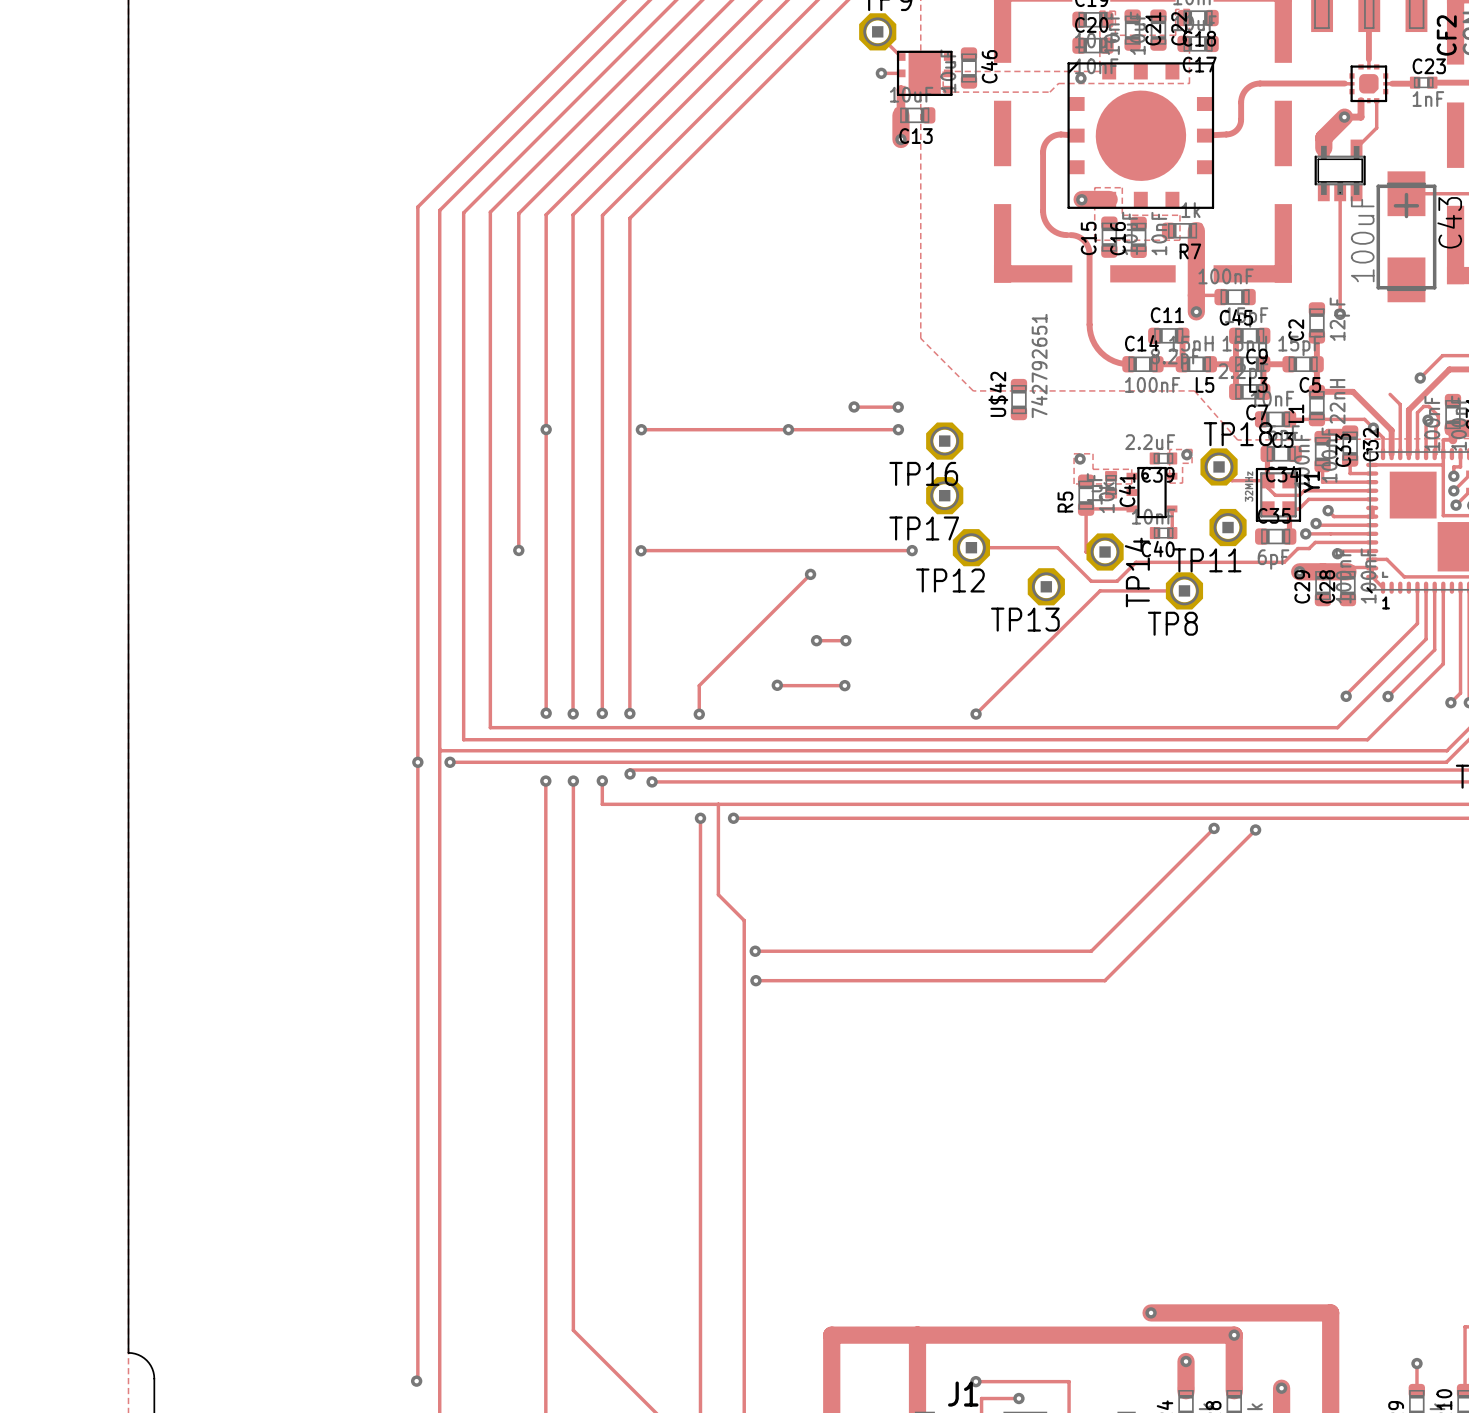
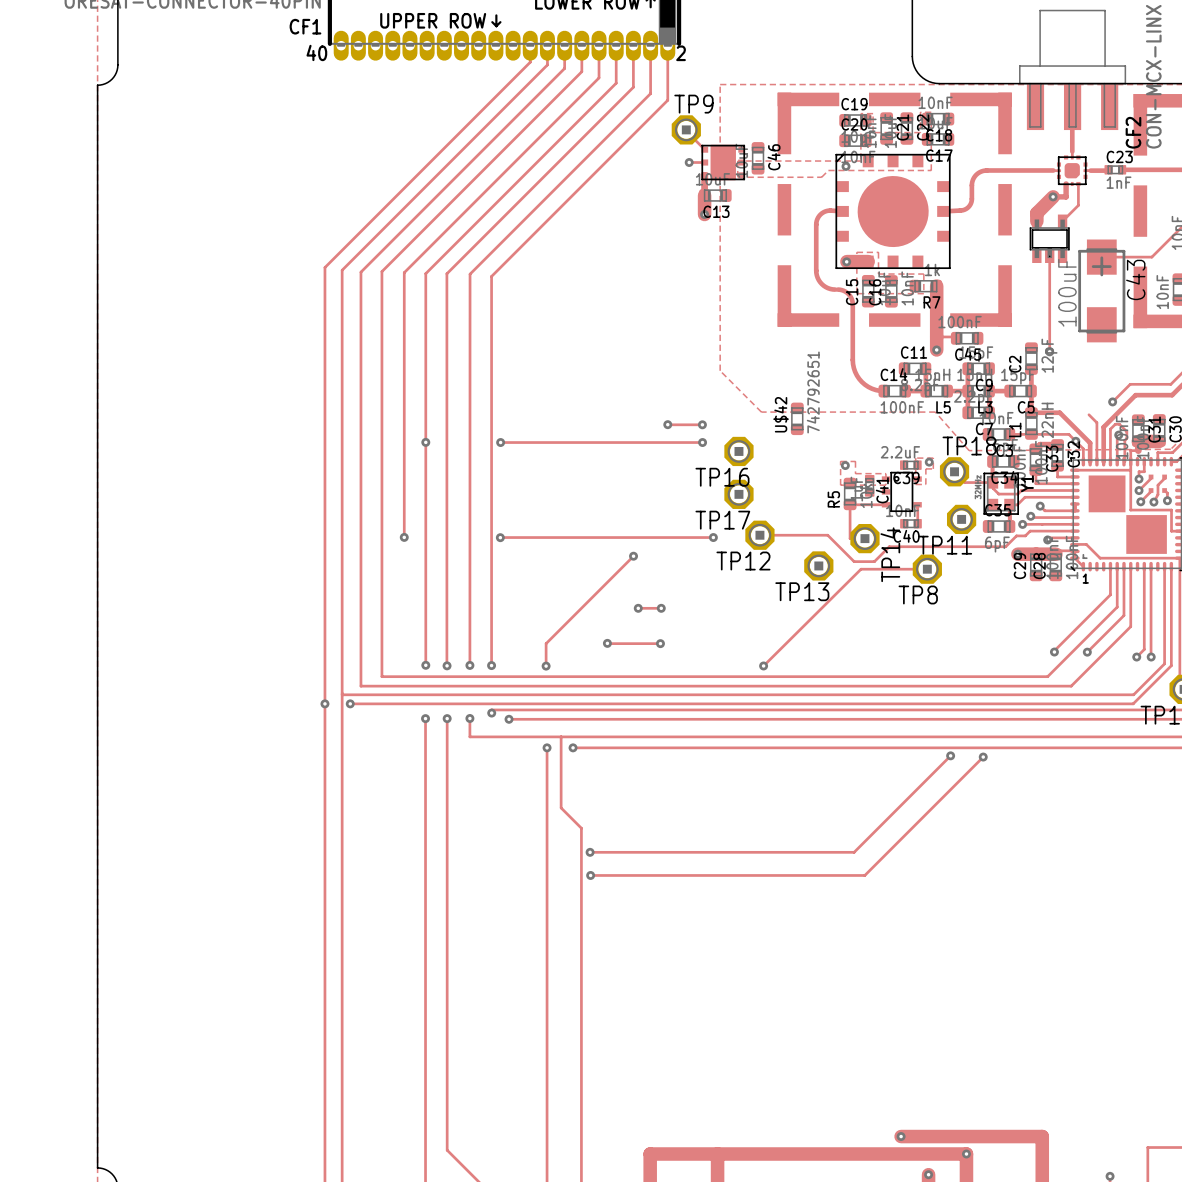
via: (788, 429) -> none

